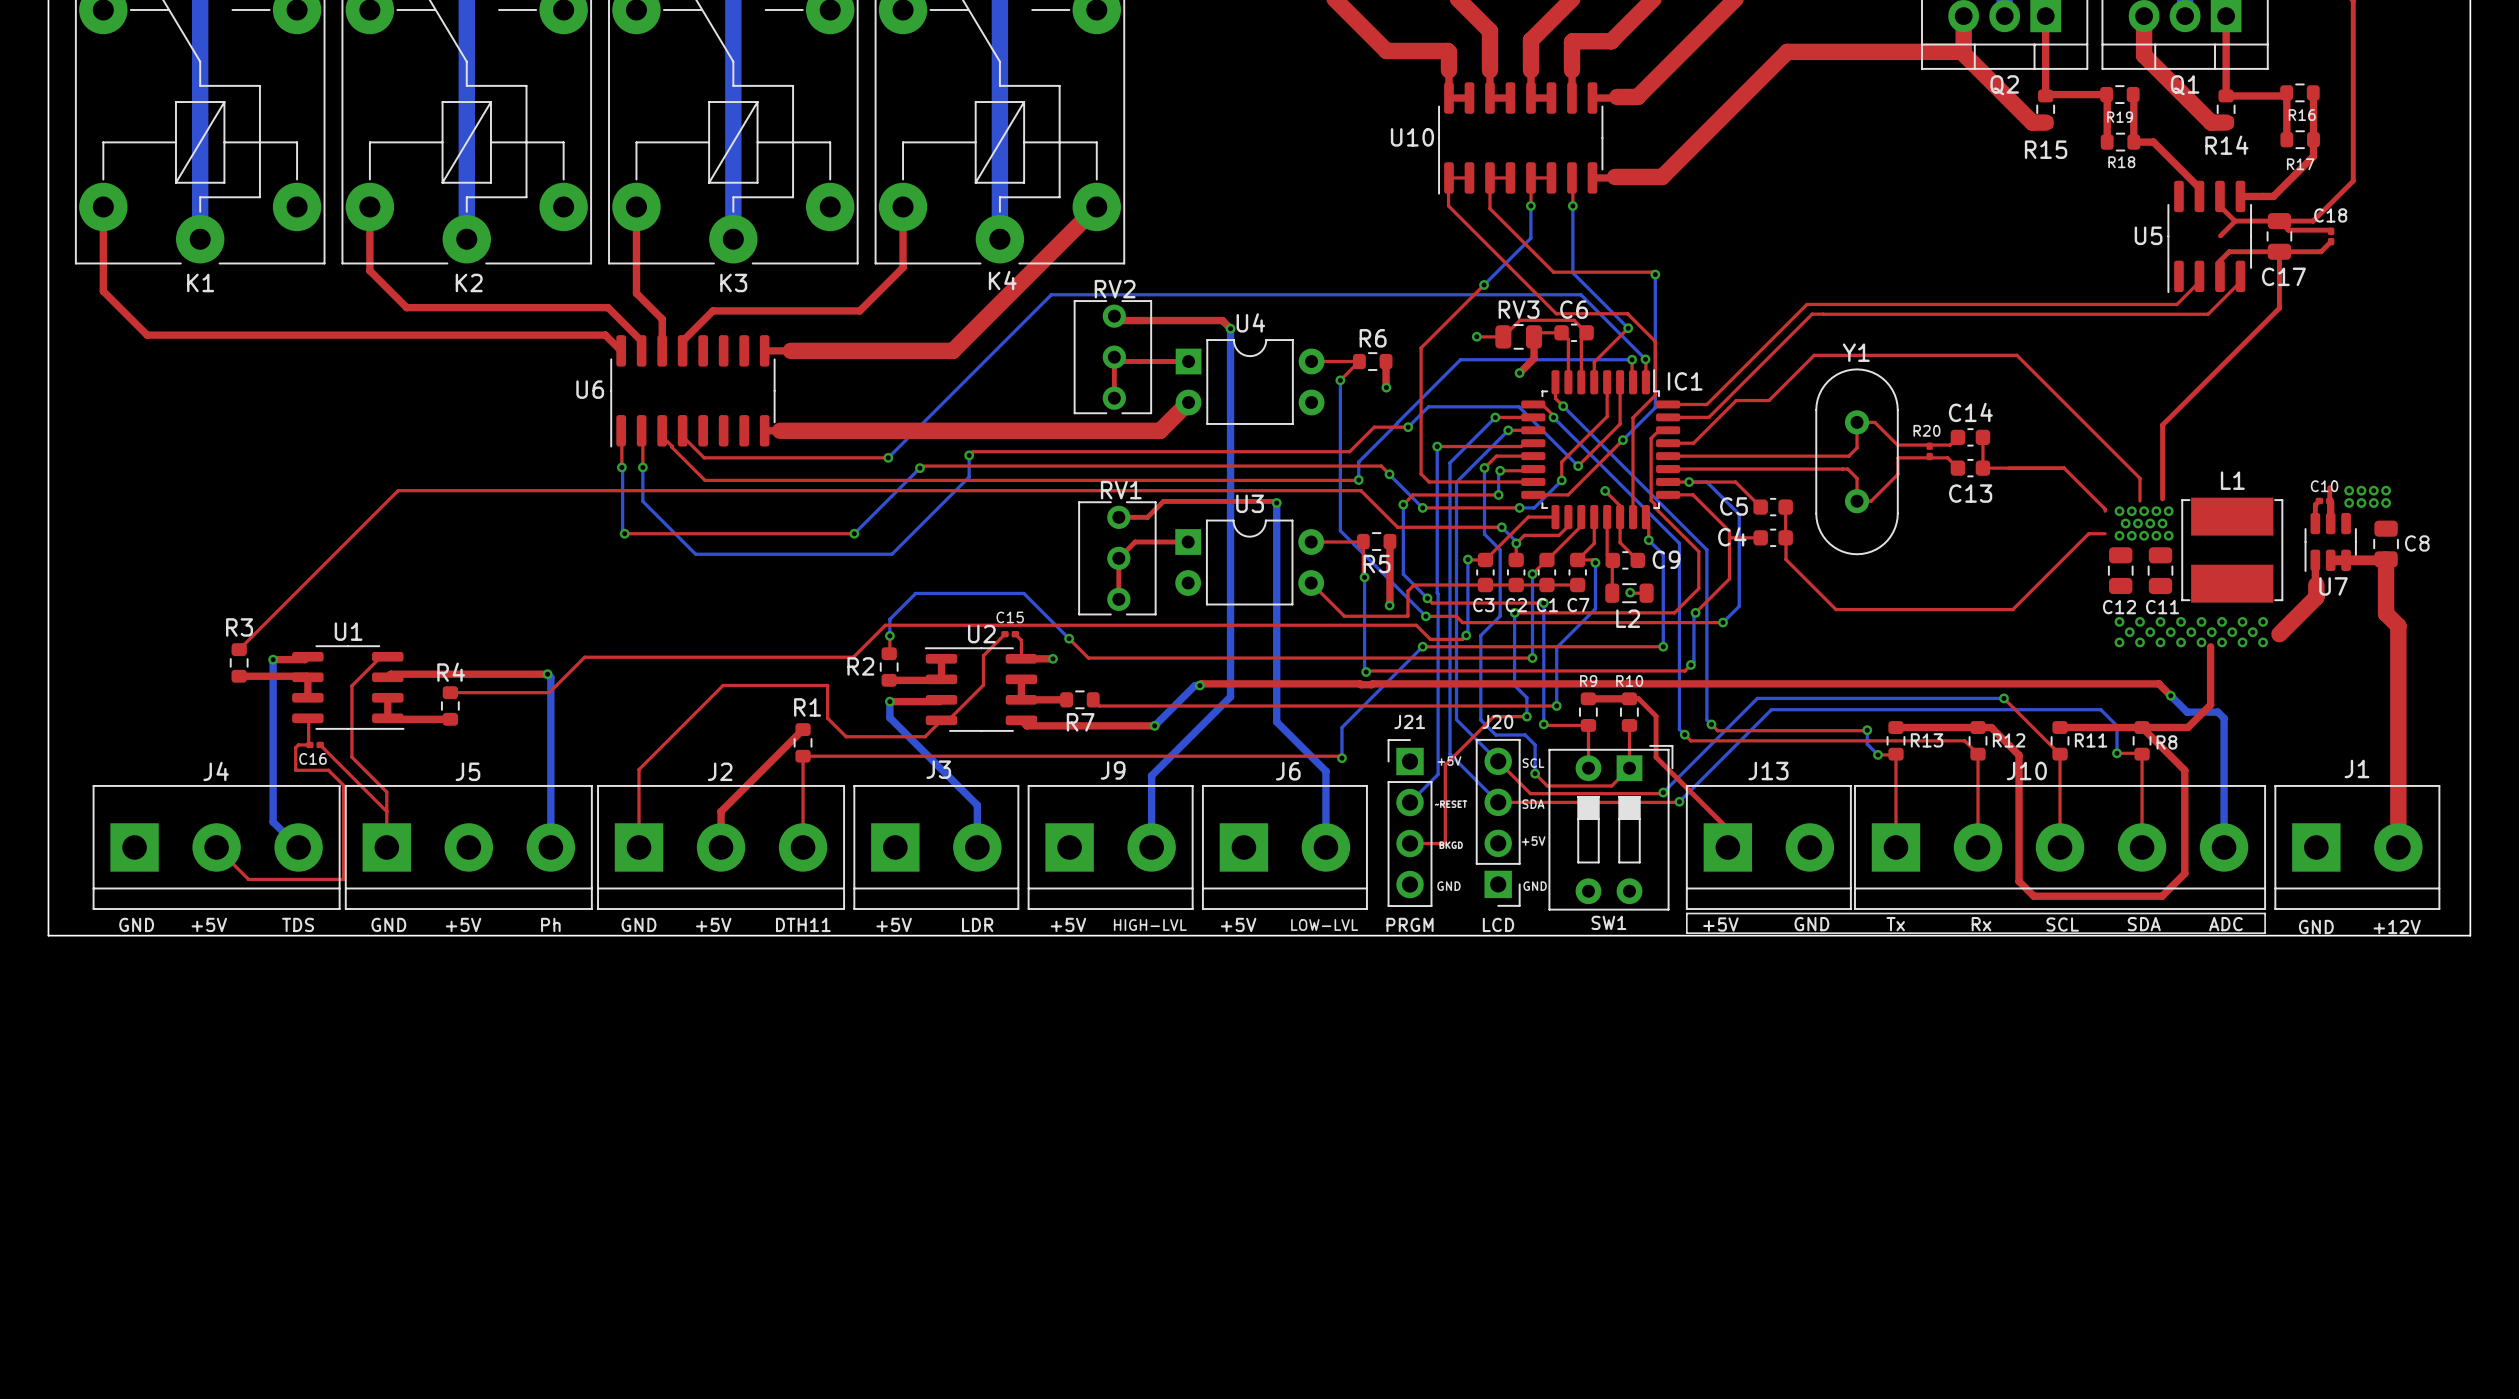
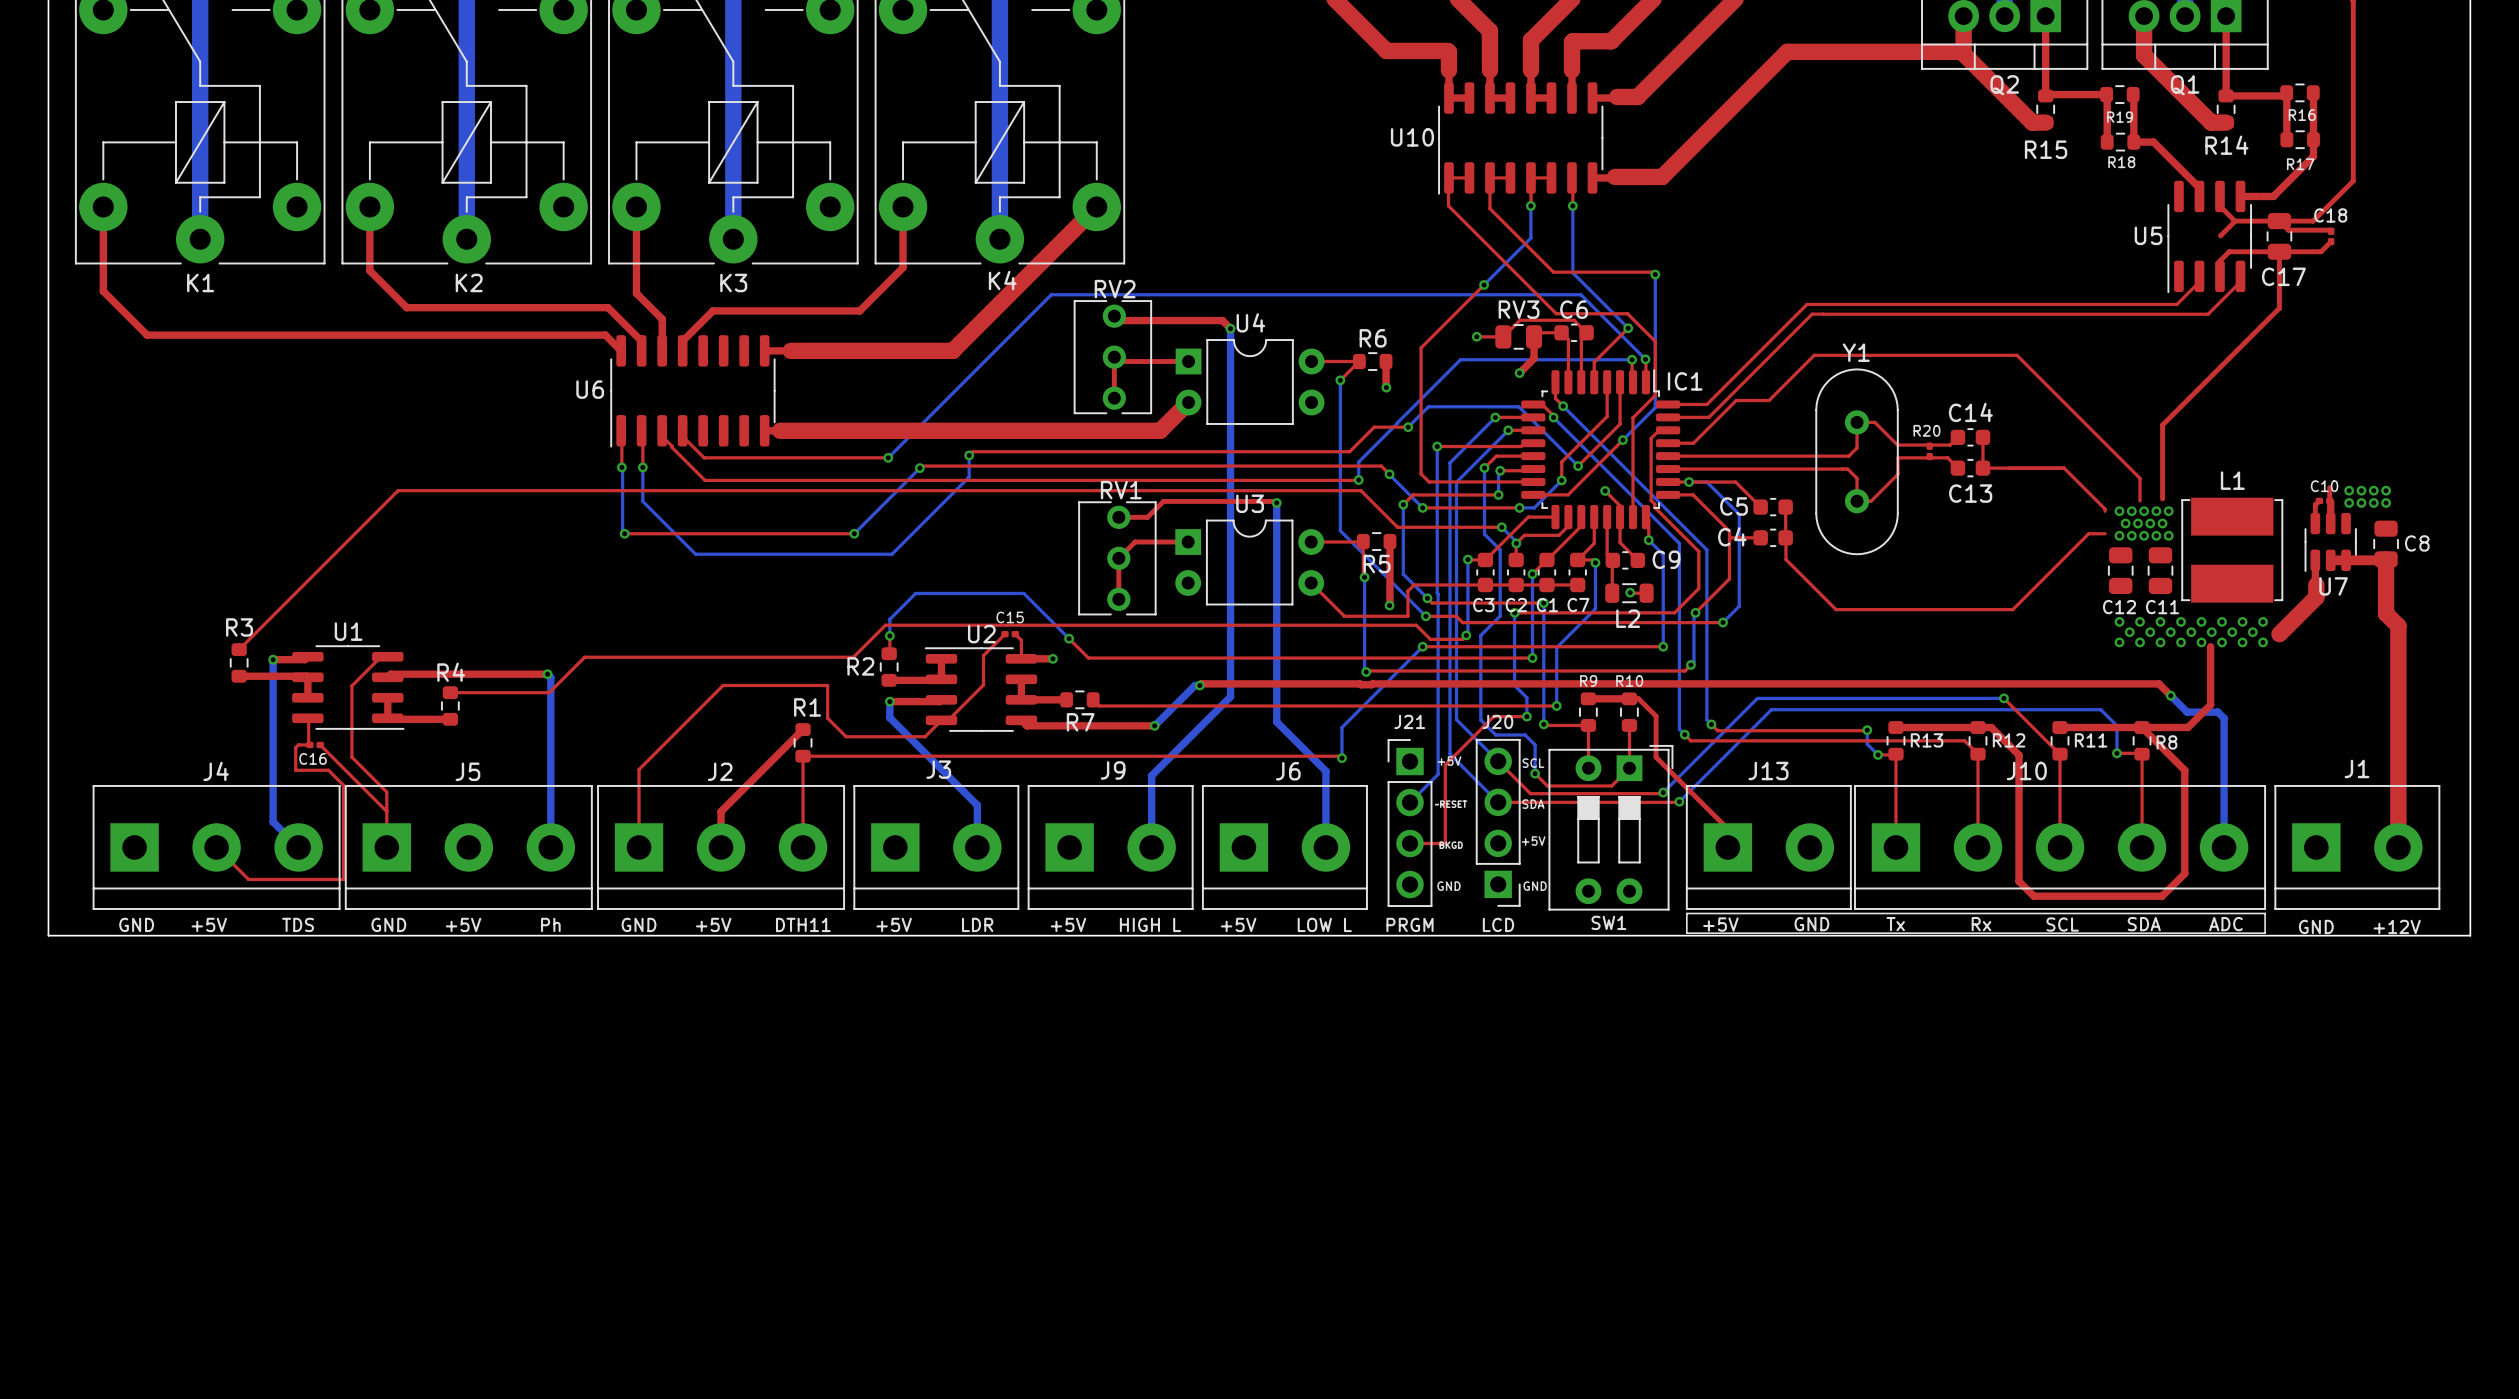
text: HIGH-LVL (1150, 925) -> HIGH L (1150, 924)
text: LOW-LVL (1324, 925) -> LOW L (1324, 924)

